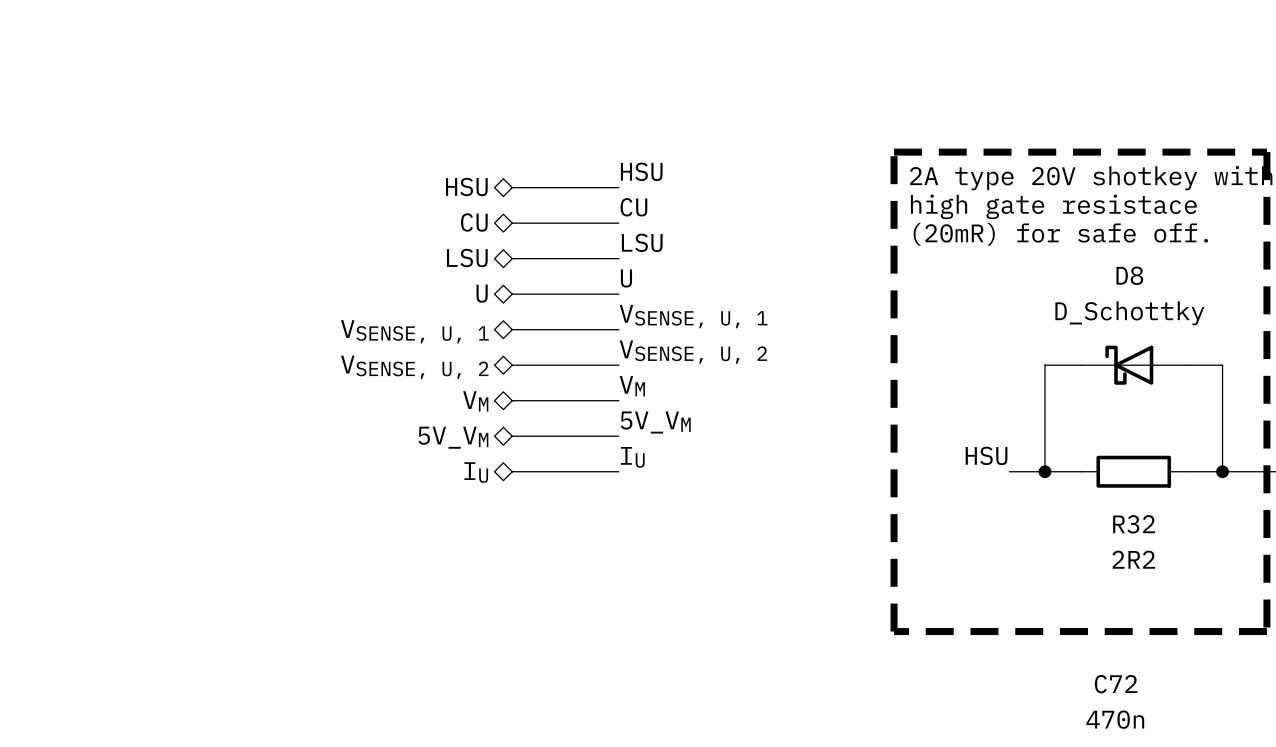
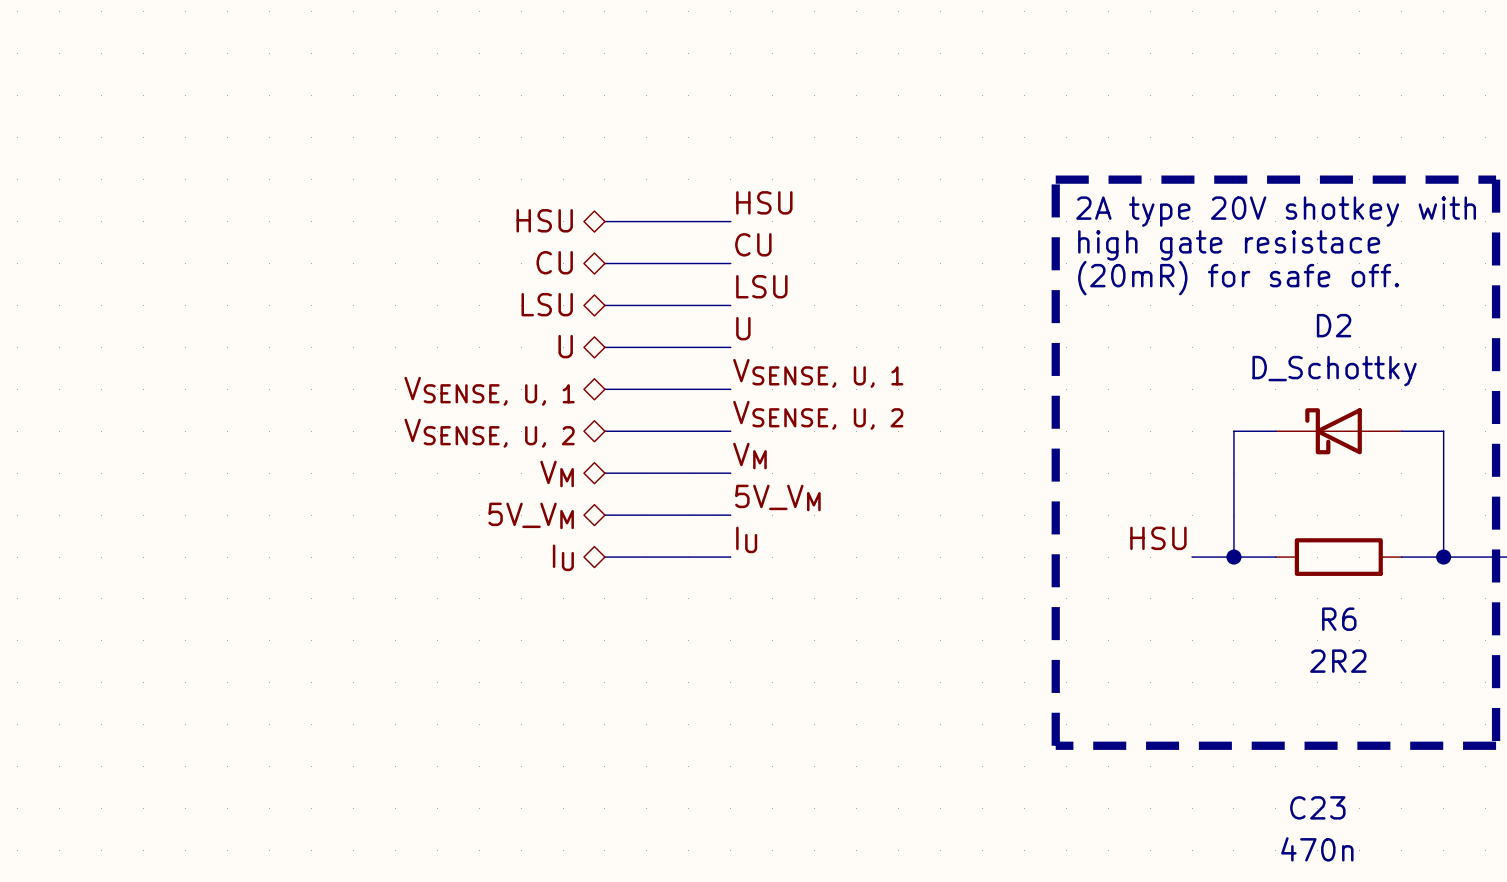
D8 name: D8 (1129, 275) -> D2 (1334, 325)
R32 name: R32 (1134, 524) -> R6 (1339, 619)
C72 name: C72 (1116, 684) -> C23 (1317, 807)

